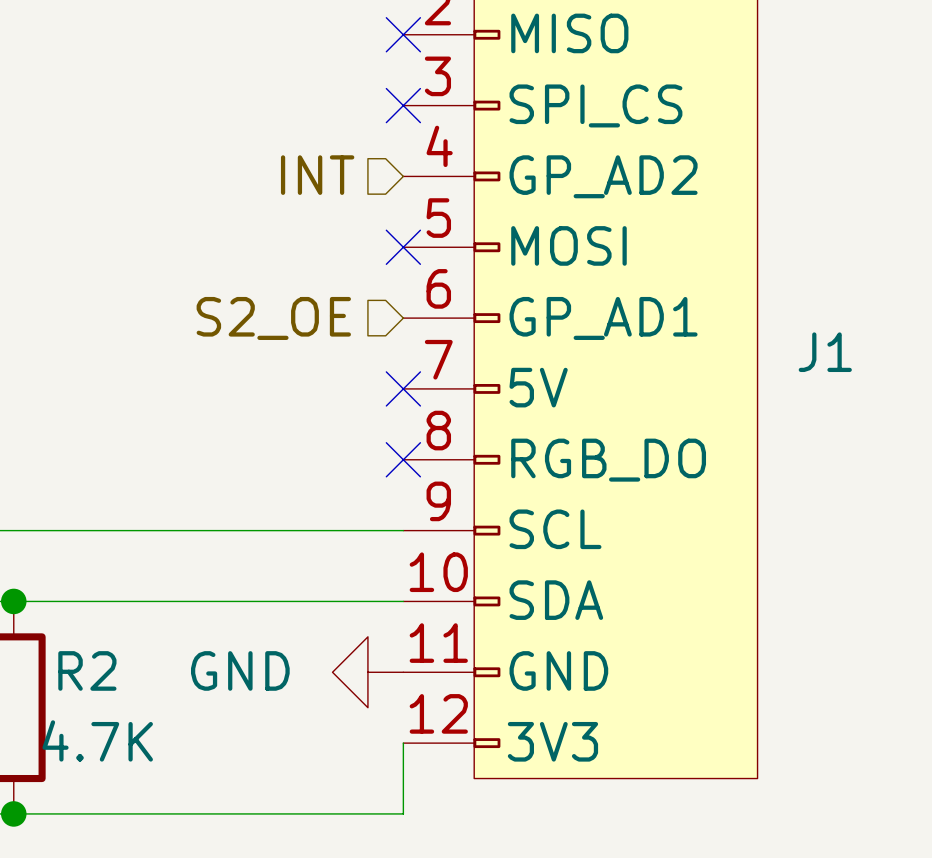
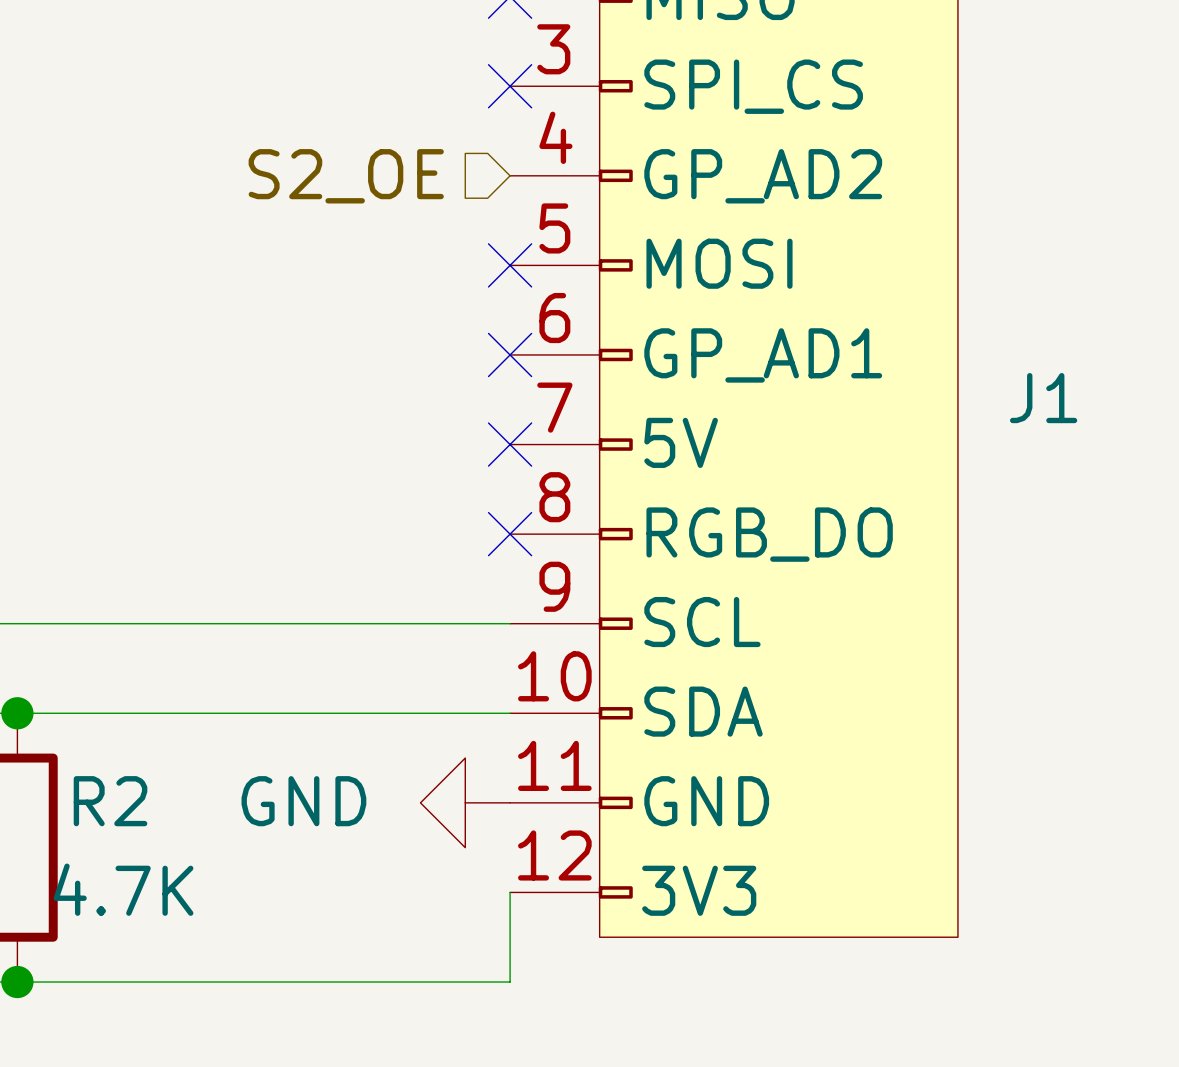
hierarchical label: INT (317, 175) -> S2_OE (346, 176)
hierarchical label: S2_OE (273, 318) -> none
no-connect mark: none -> (510, 354)

